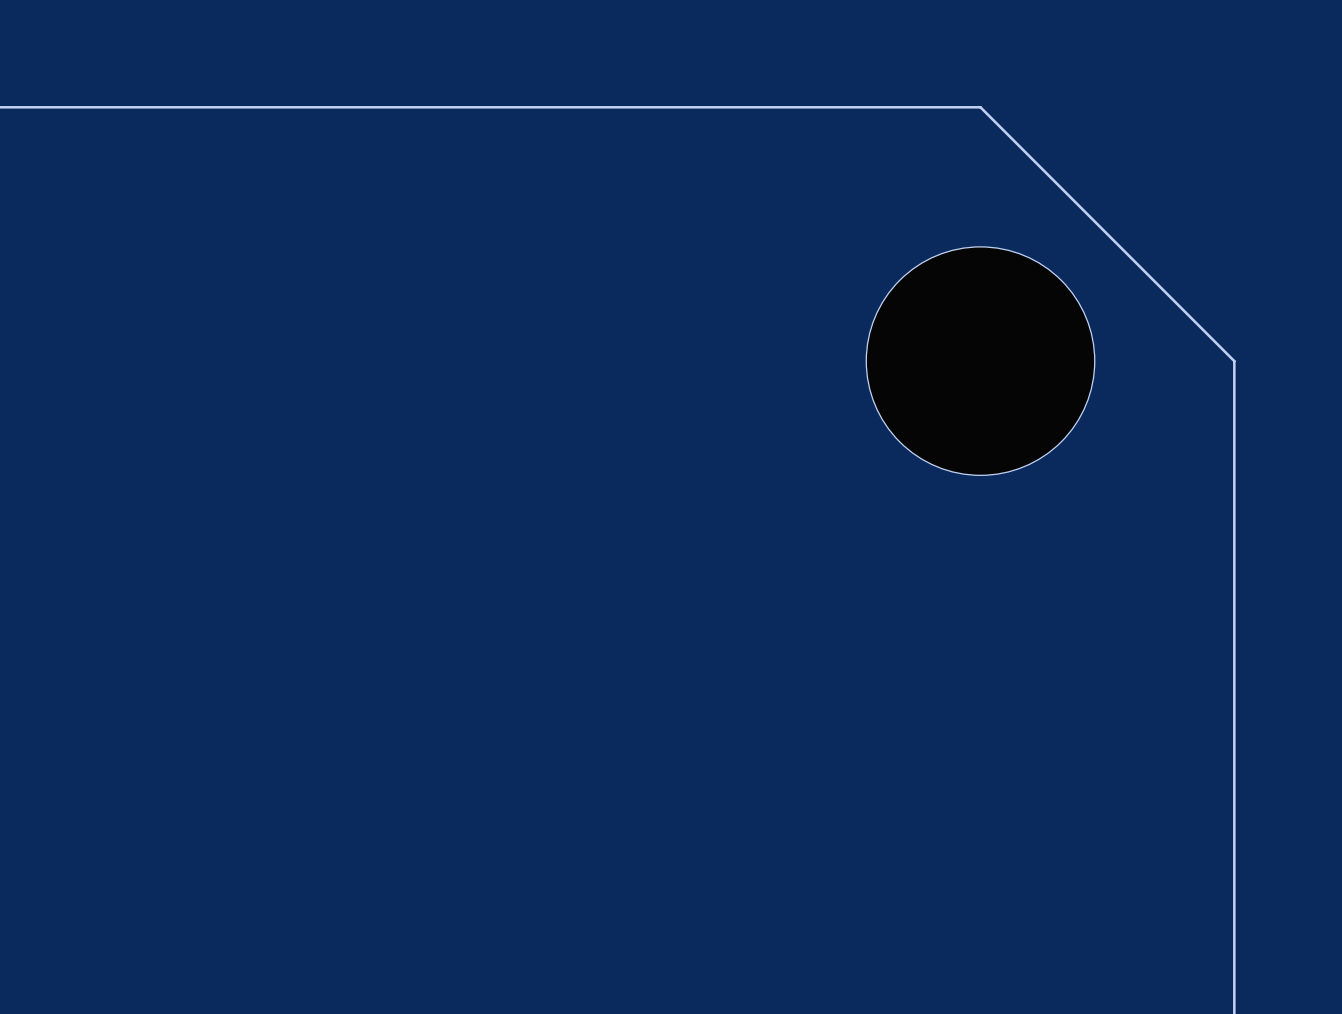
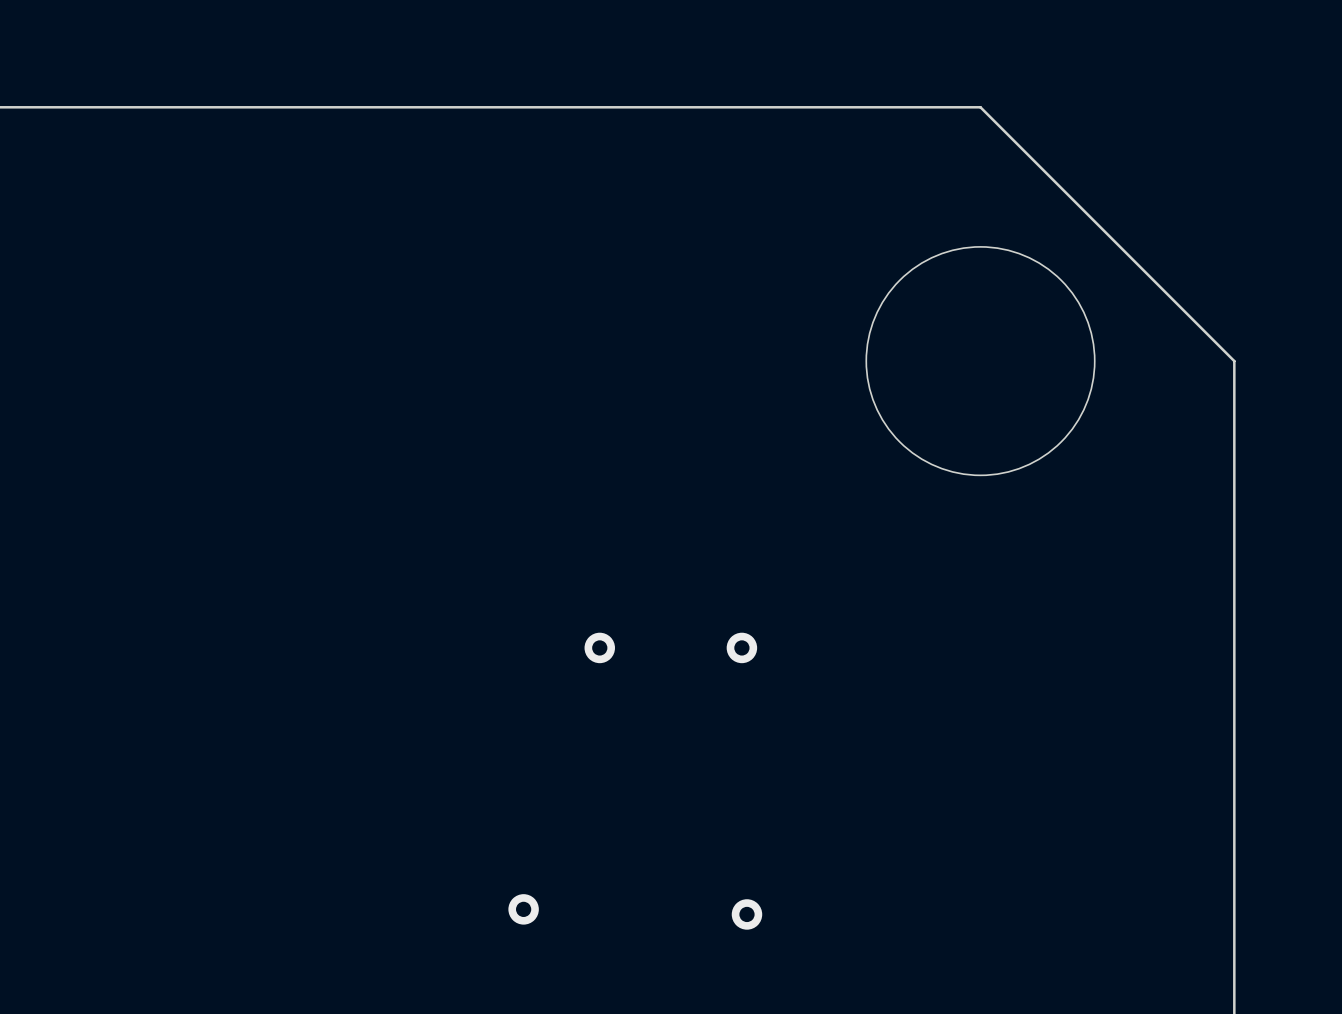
via: none -> (599, 647)
via: none -> (741, 647)
via: none -> (523, 909)
via: none -> (746, 914)

